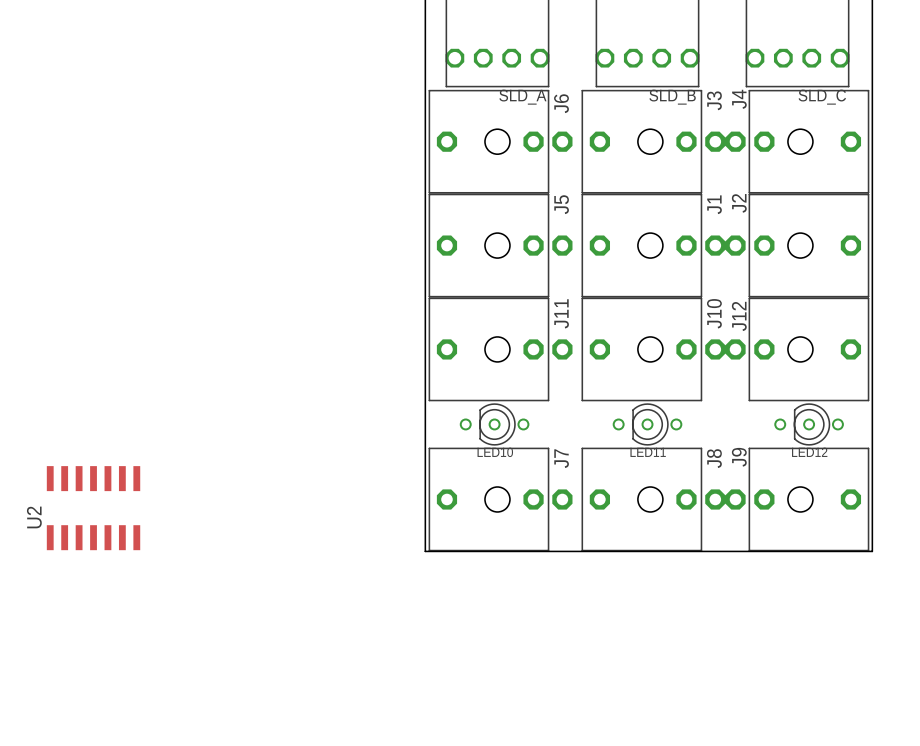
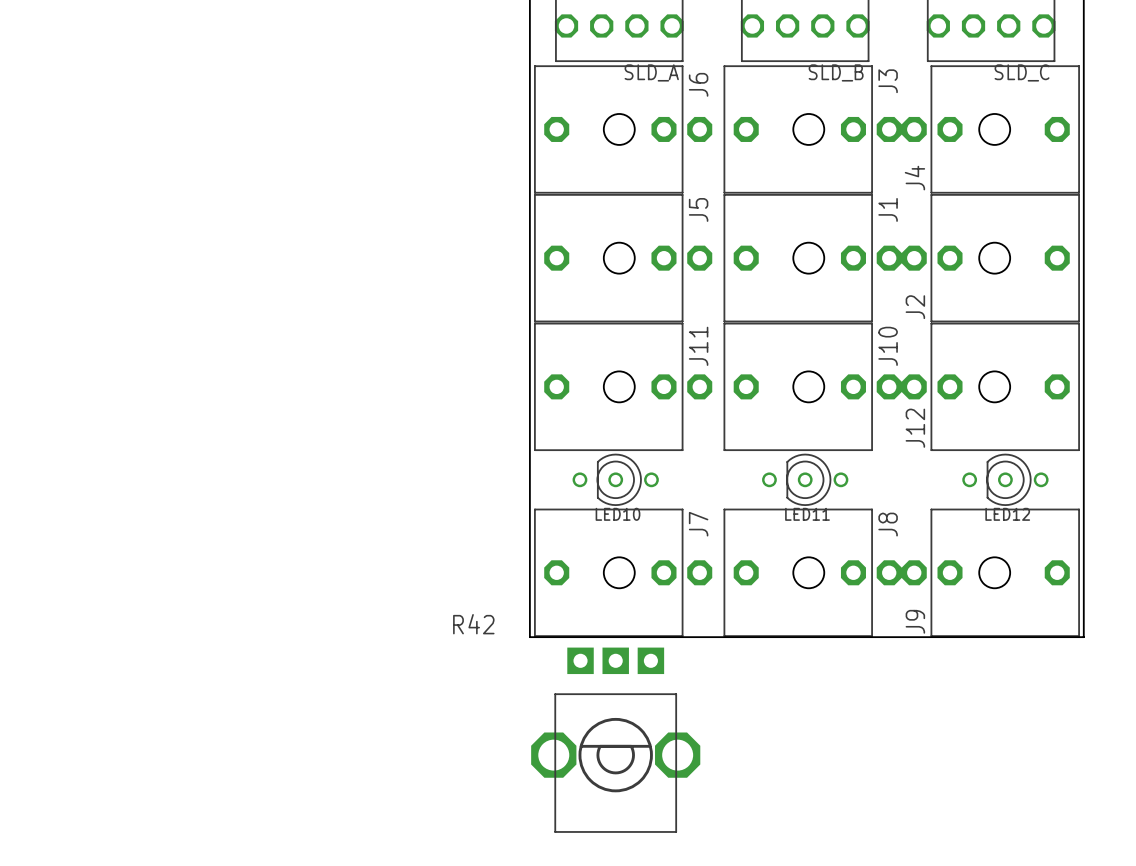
J4 name position: J4 (739, 99) -> J4 (914, 178)
J2 name position: J2 (739, 203) -> J2 (915, 307)
J12 name position: J12 (739, 316) -> J12 (915, 428)
J9 name position: J9 (739, 457) -> J9 (915, 621)
U2: (93, 508) -> none
R42: none -> (615, 740)

